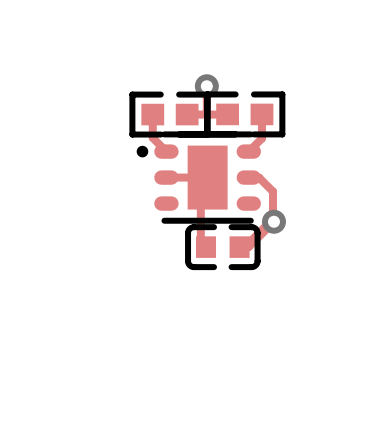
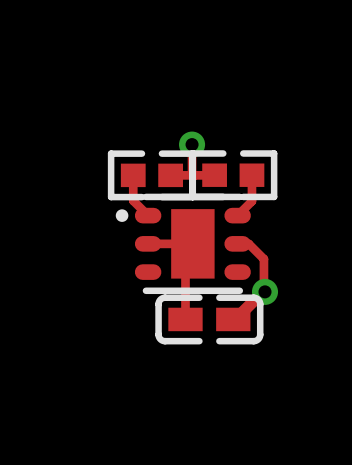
part footprint: [185, 224, 261, 271] -> [155, 294, 264, 345]

